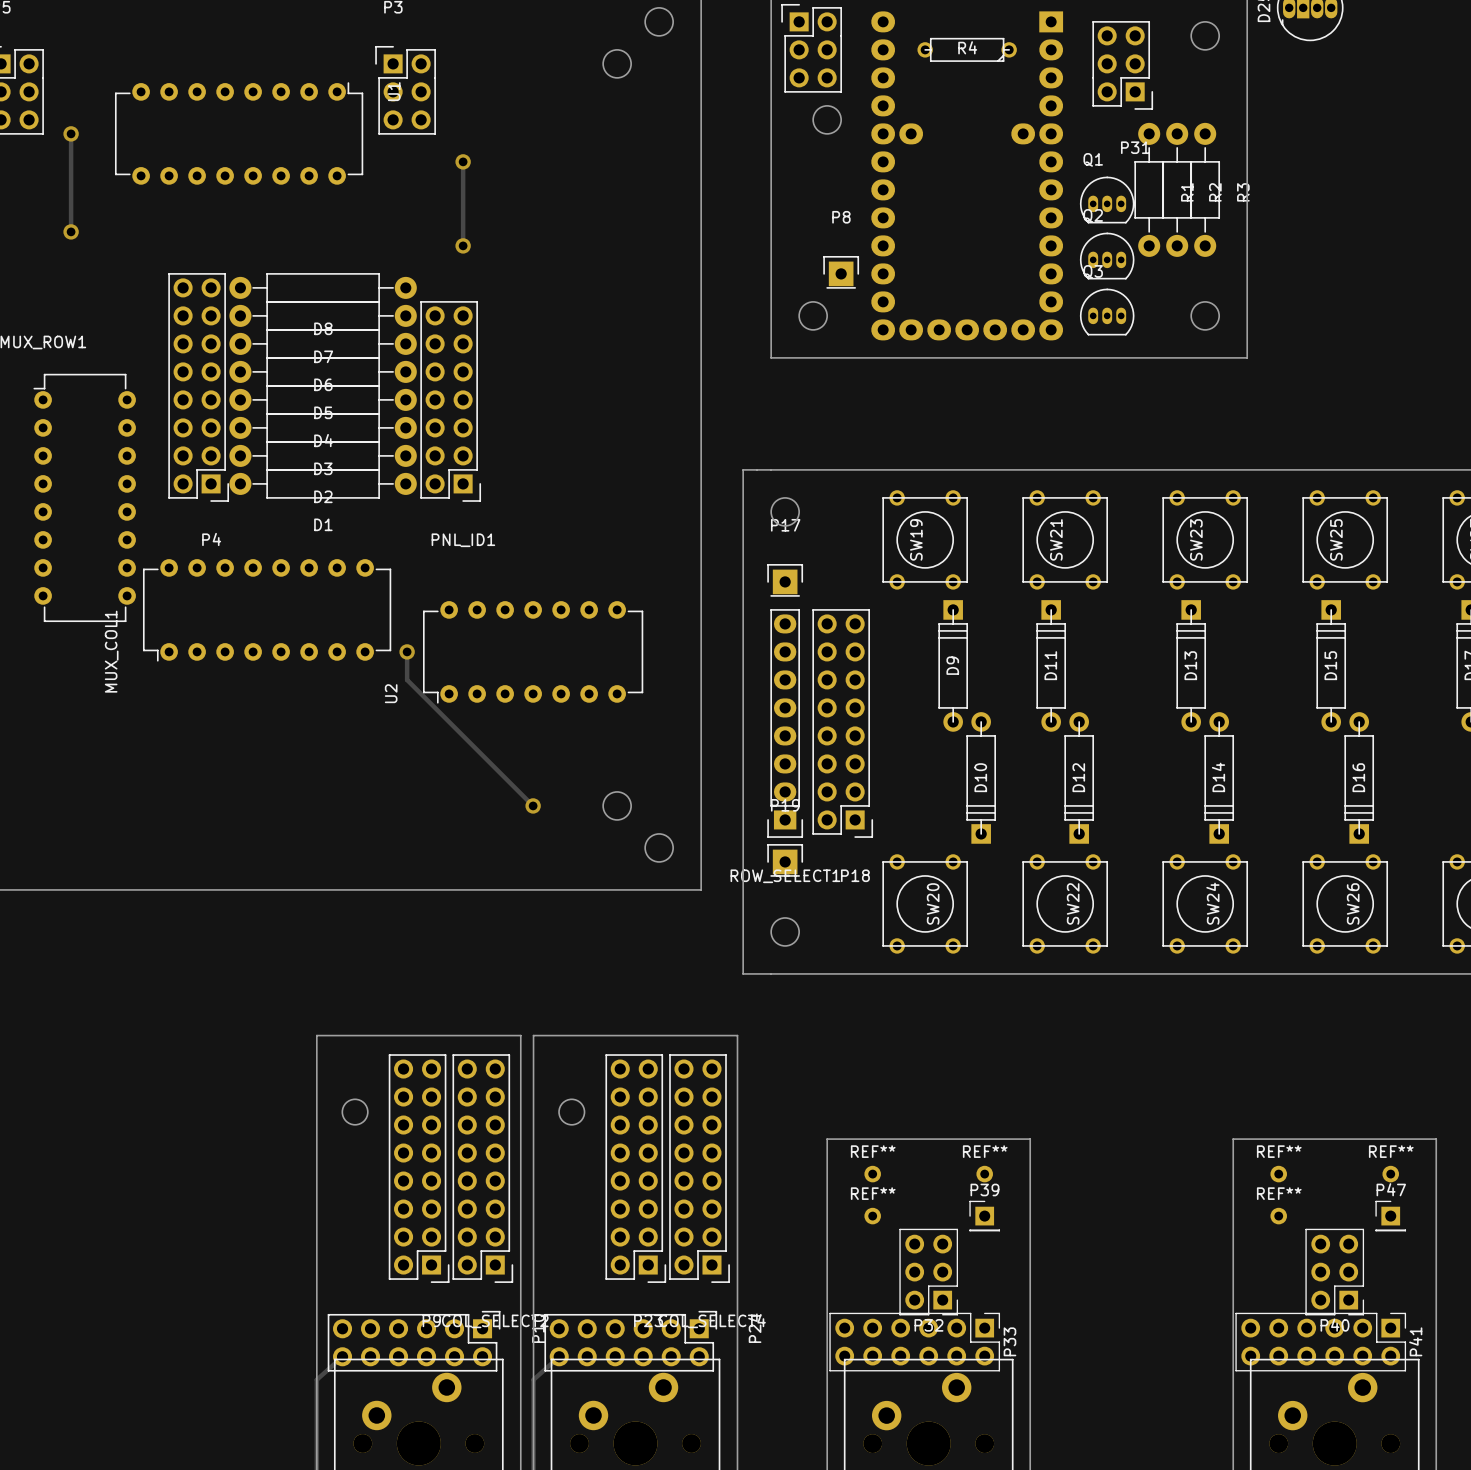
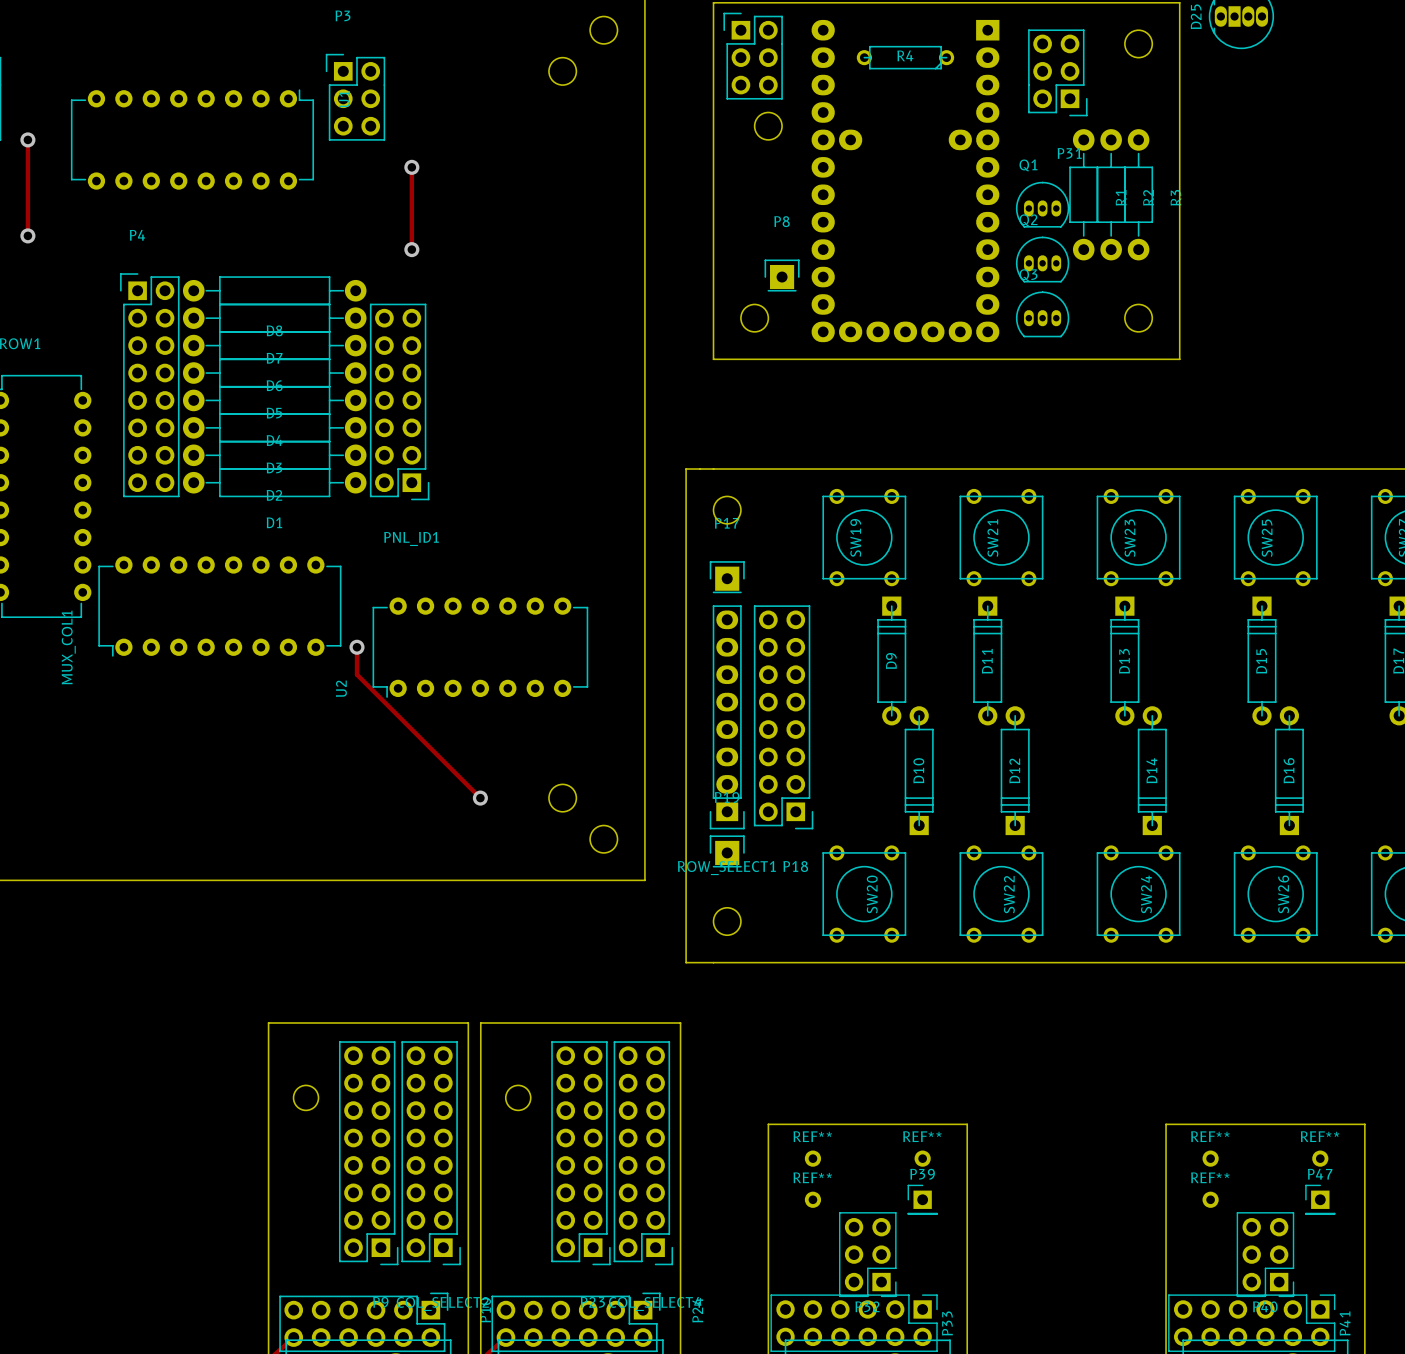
P4 rotation: 0° (198, 387) -> 180° (149, 385)

